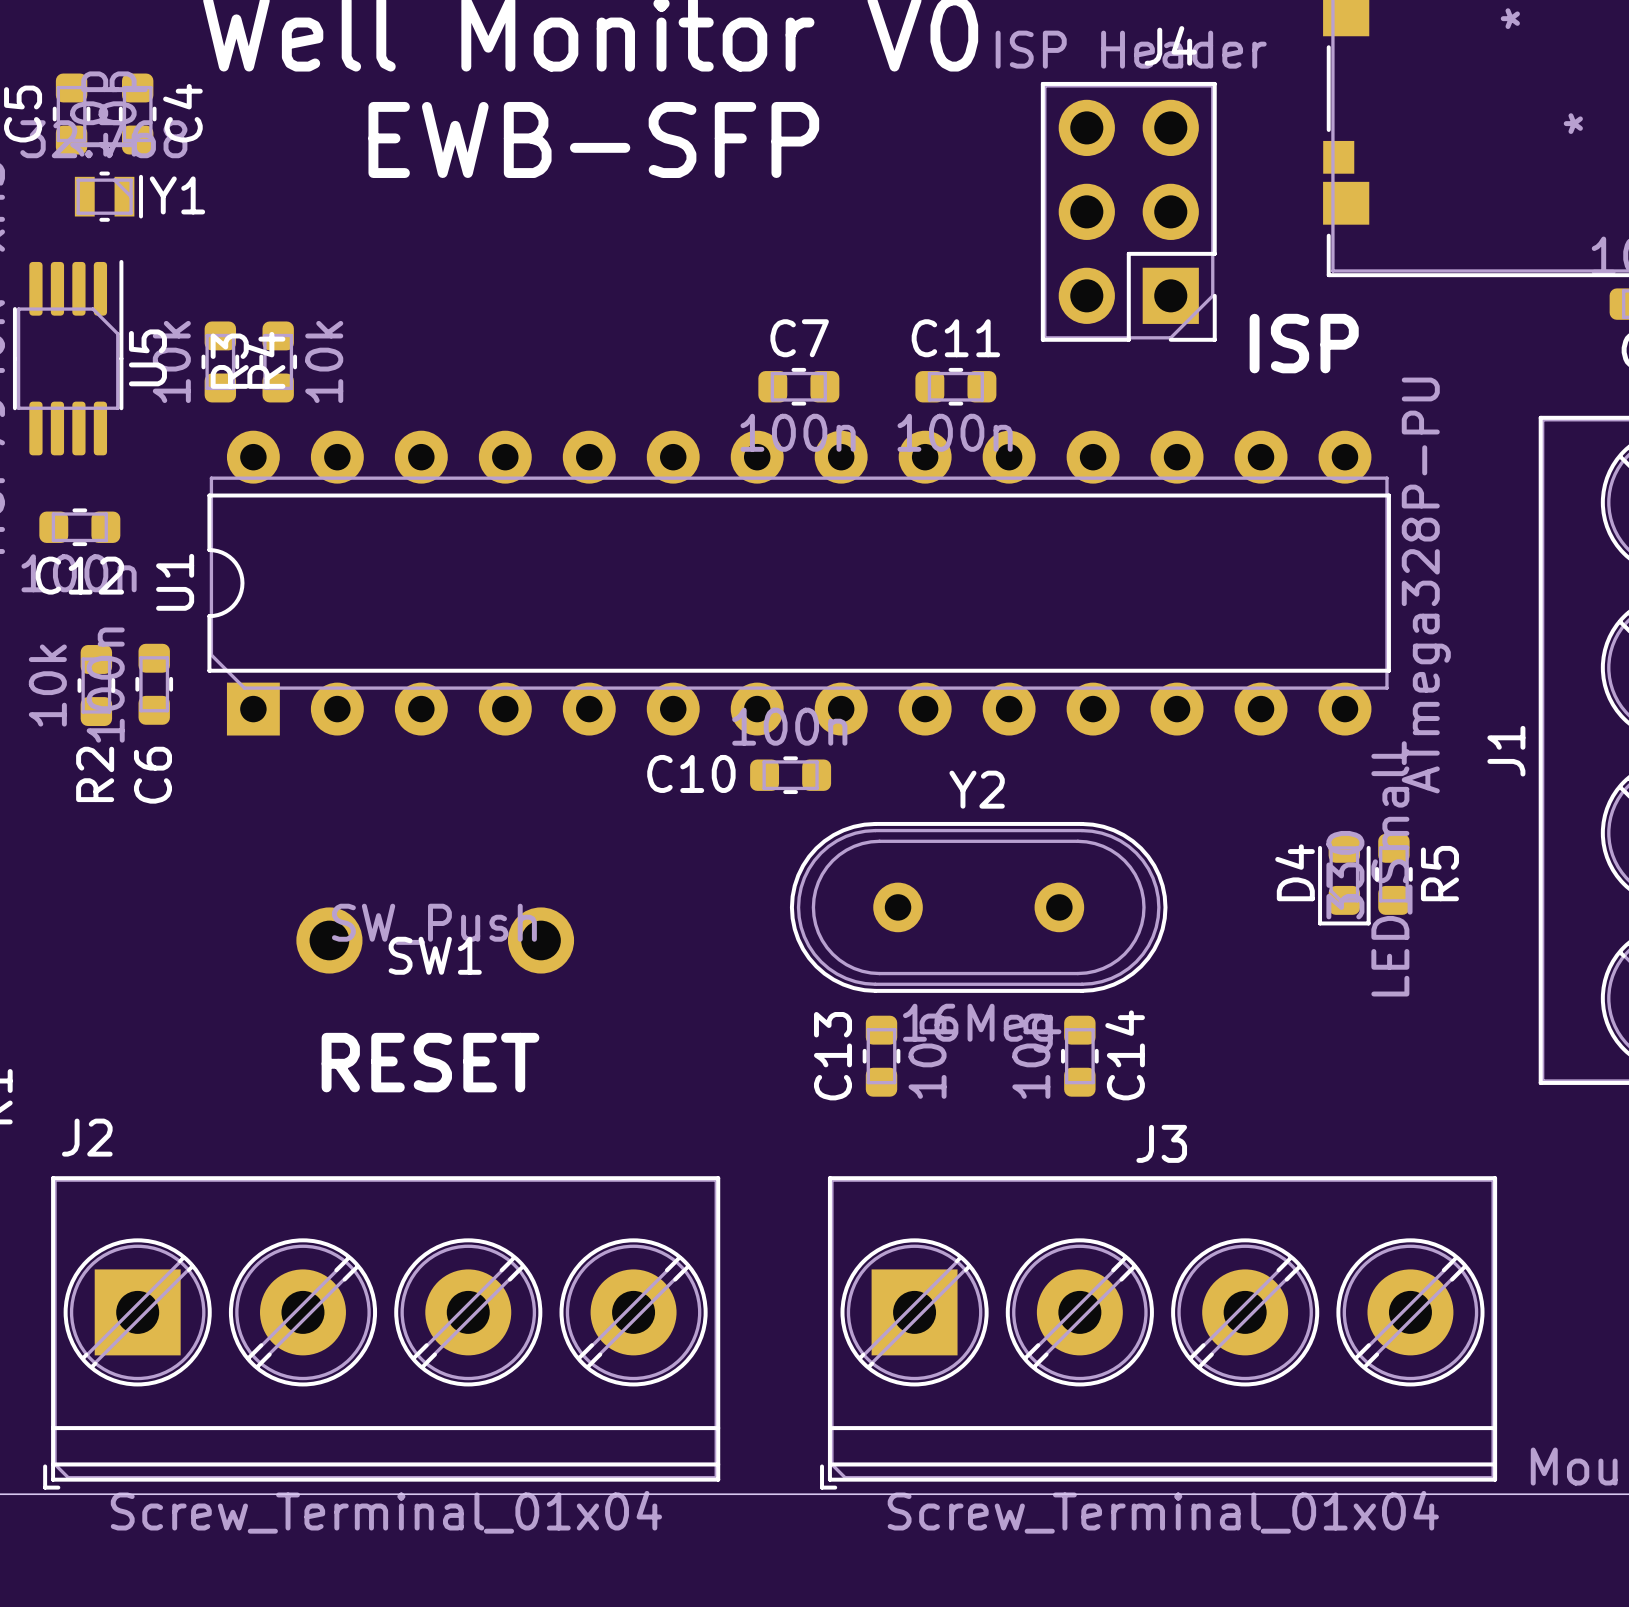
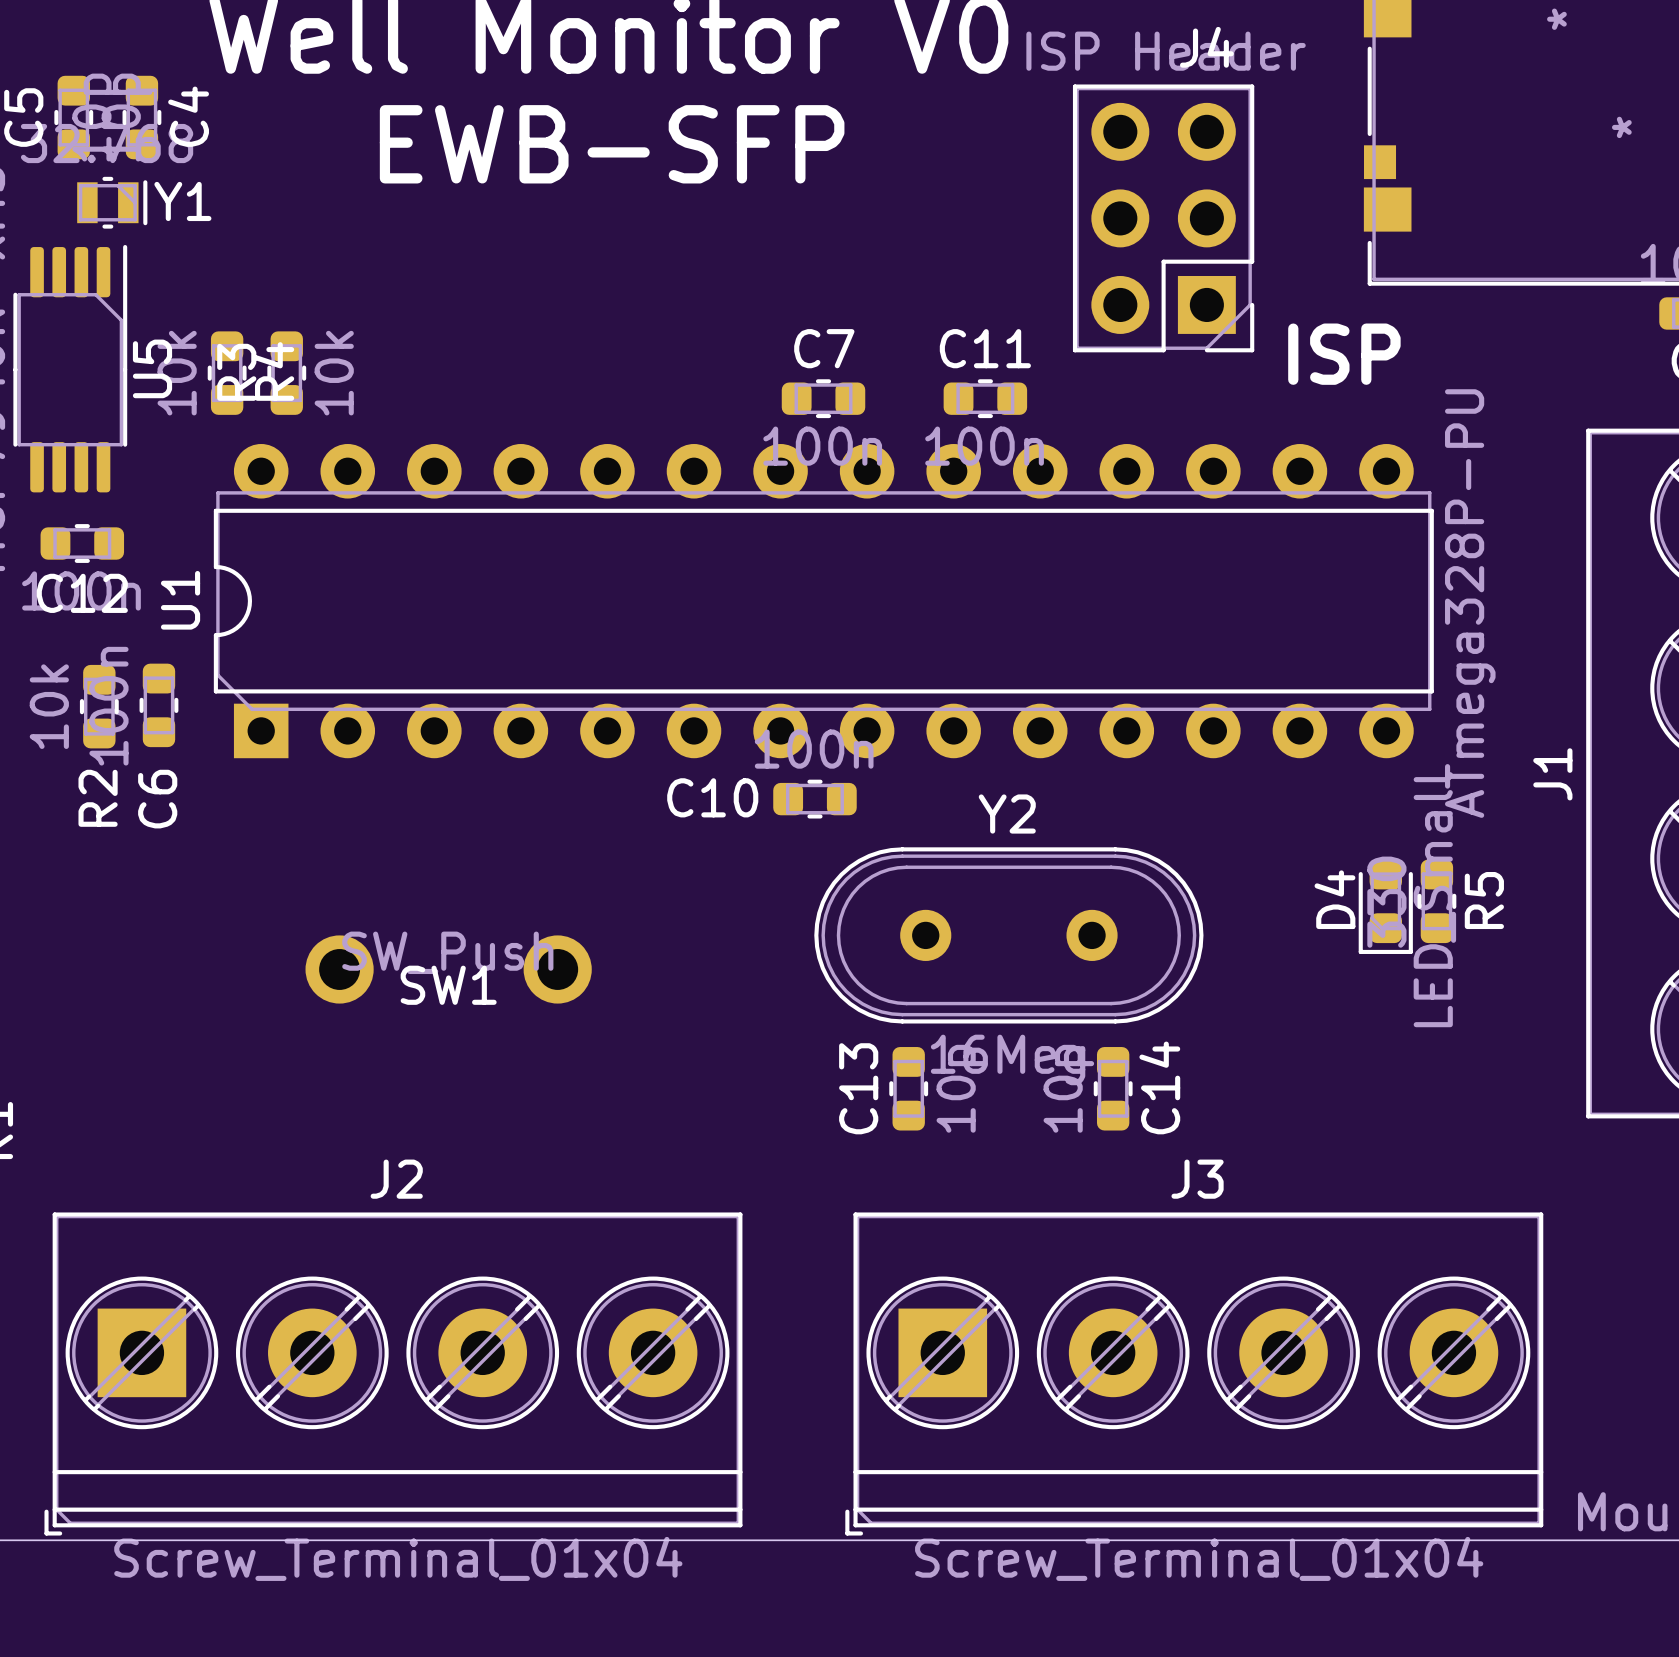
U5 footprint: [12, 259, 124, 456] -> [13, 244, 128, 493]
text: RESET (430, 1062) -> none
J2 name position: J2 (87, 1137) -> J2 (396, 1179)

